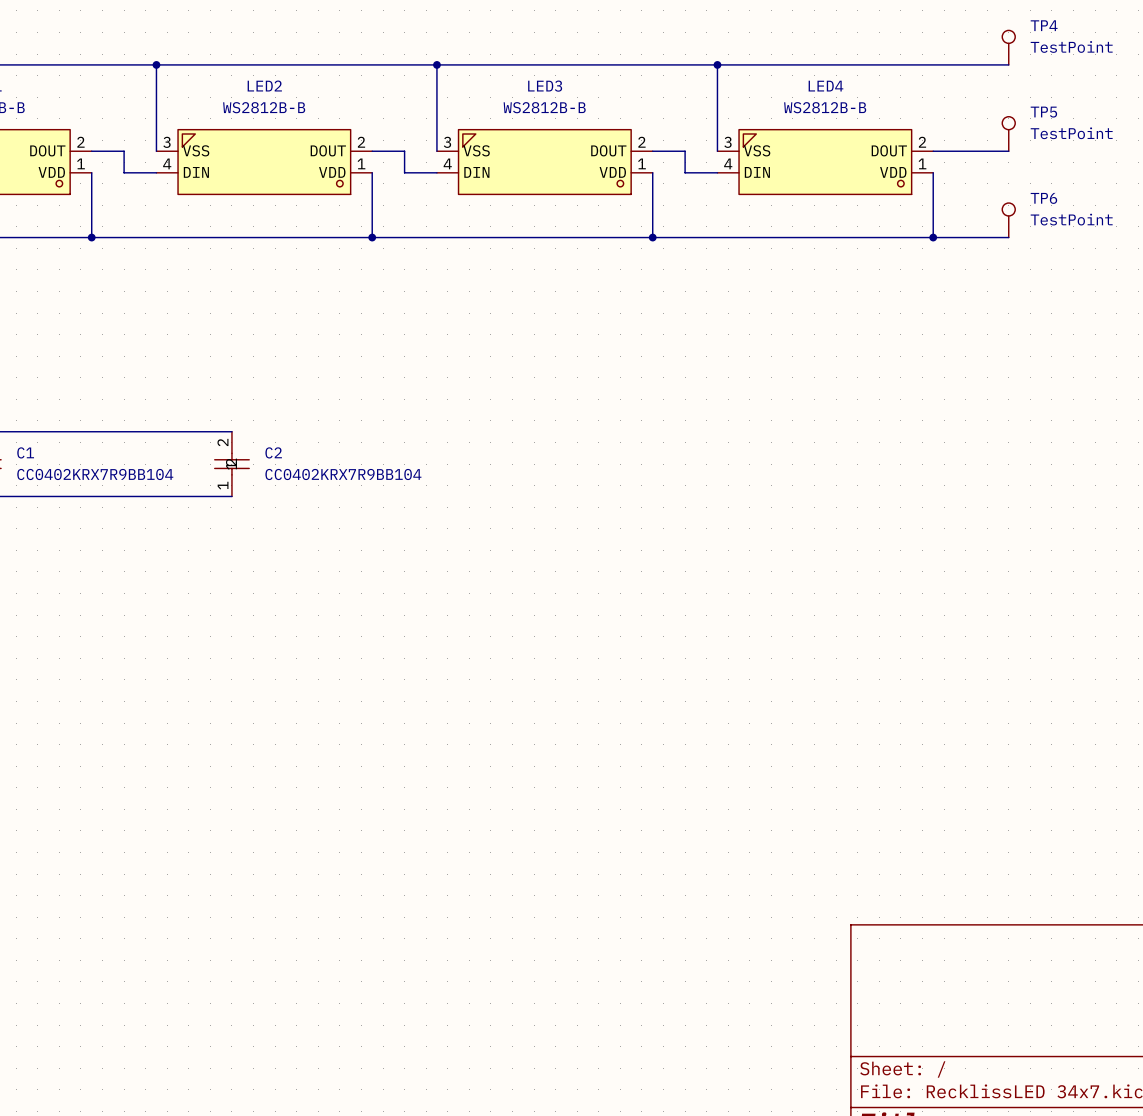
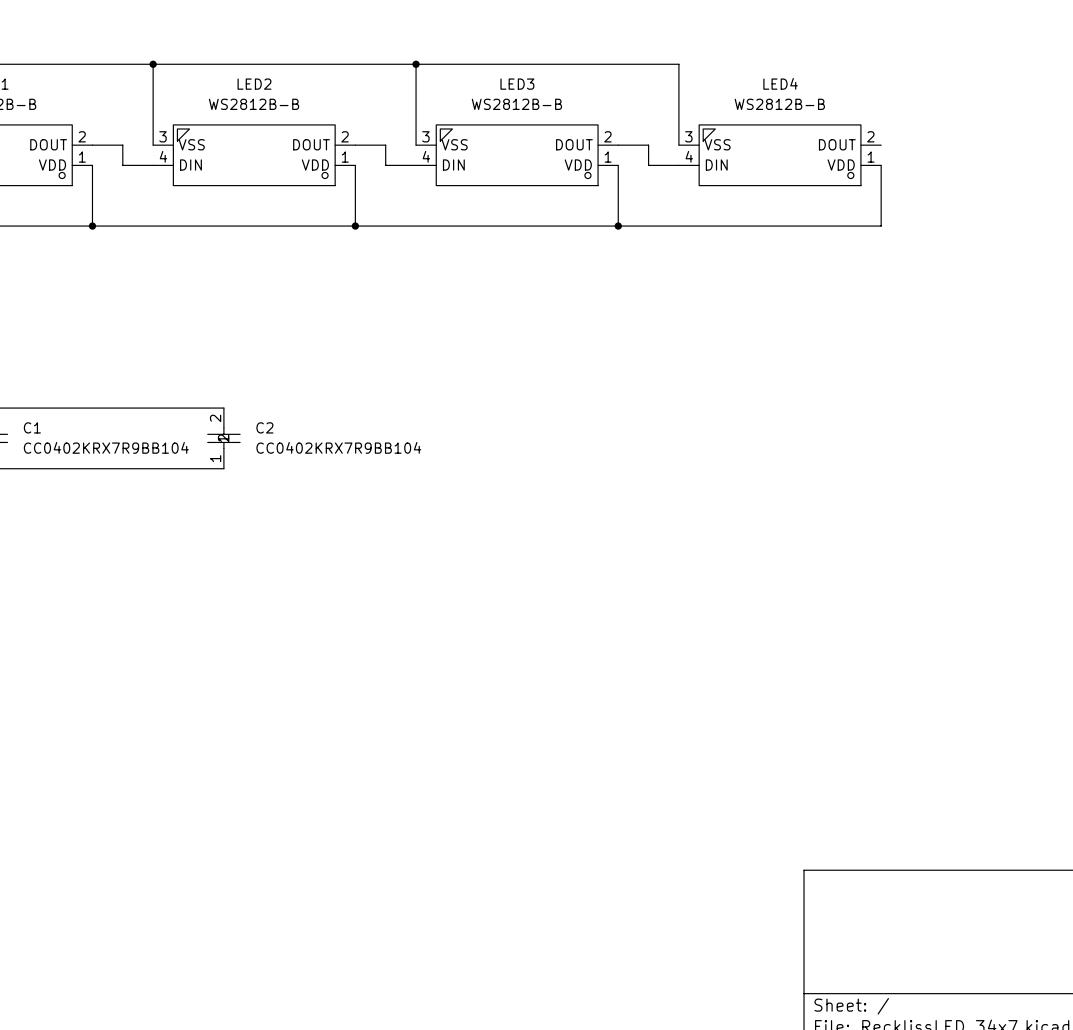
TP4: TestPoint (1008, 47) -> none
wire: (717, 64) (1008, 64) -> none
junction: (717, 64) -> none
TP5: TestPoint (1008, 133) -> none
wire: (933, 151) (1008, 151) -> none
TP6: TestPoint (1008, 220) -> none
wire: (933, 237) (1008, 237) -> none
junction: (933, 237) -> none

